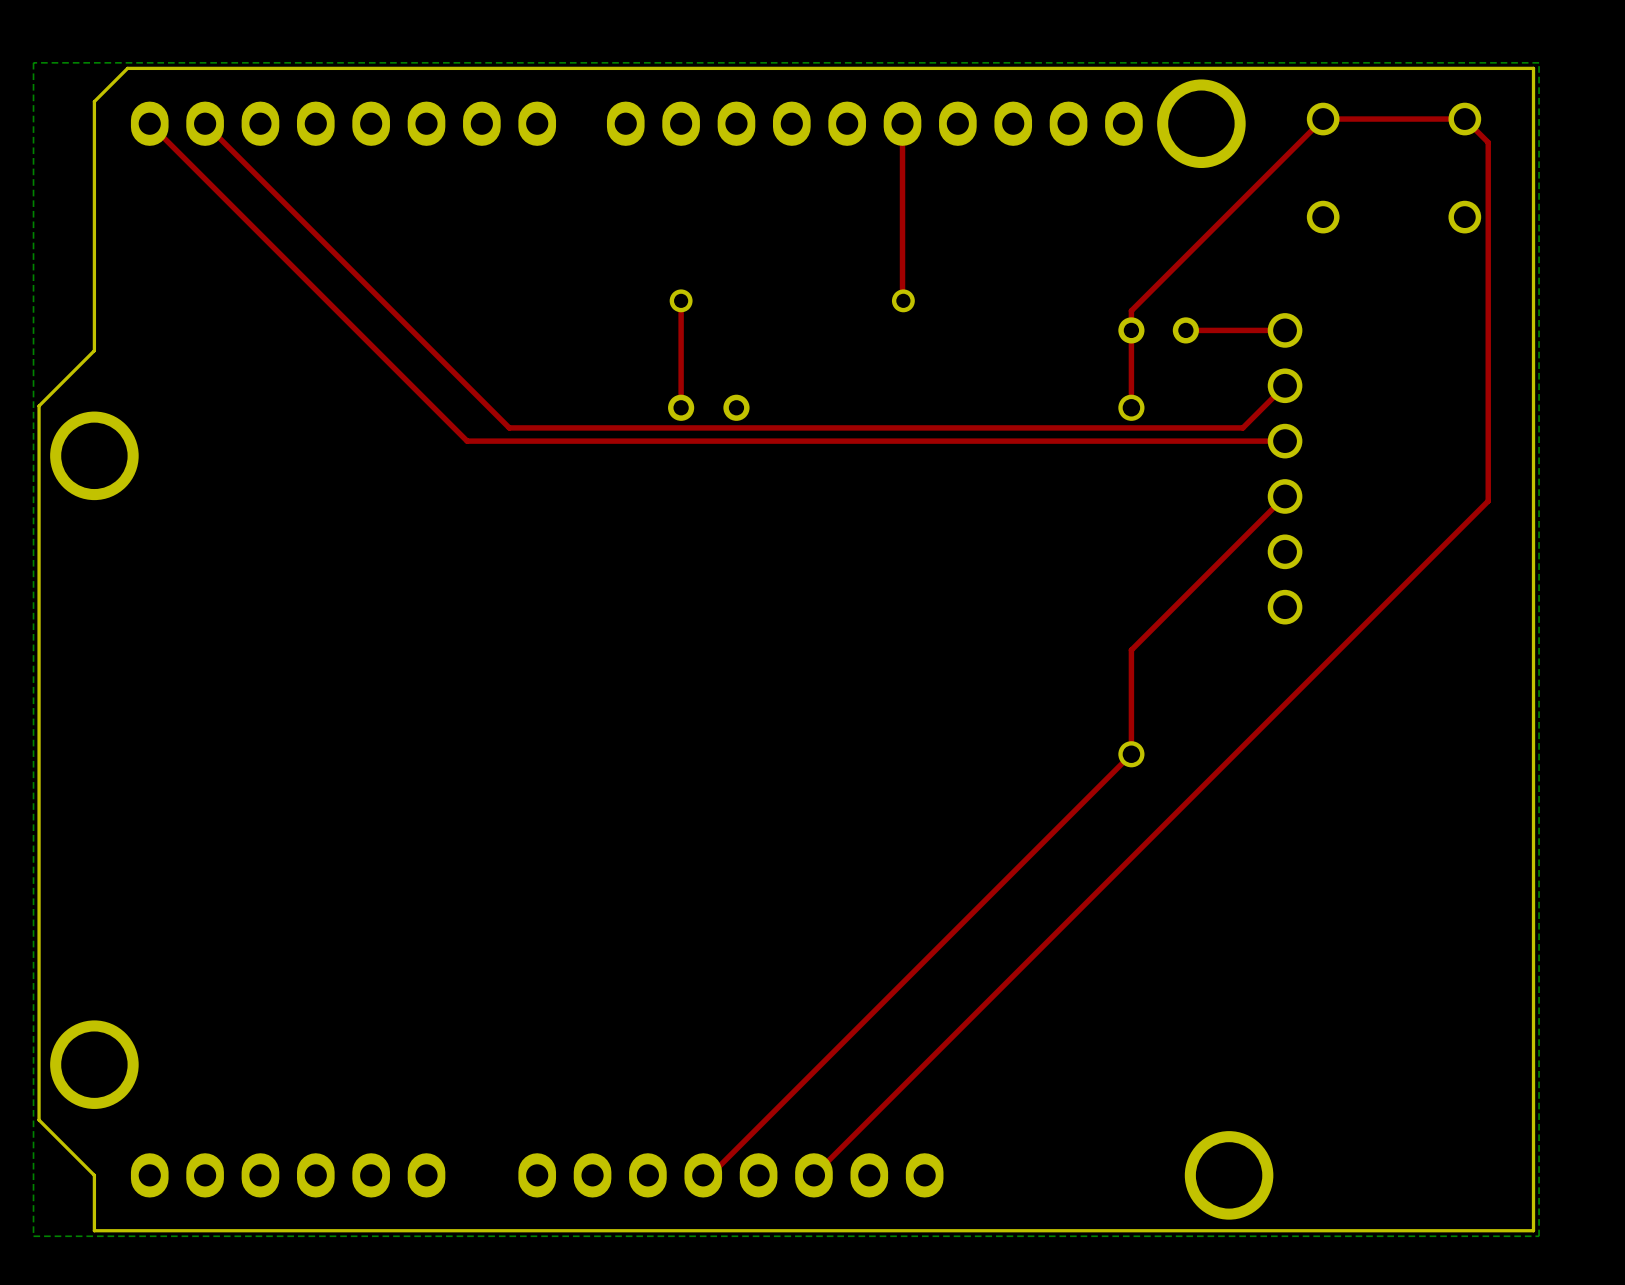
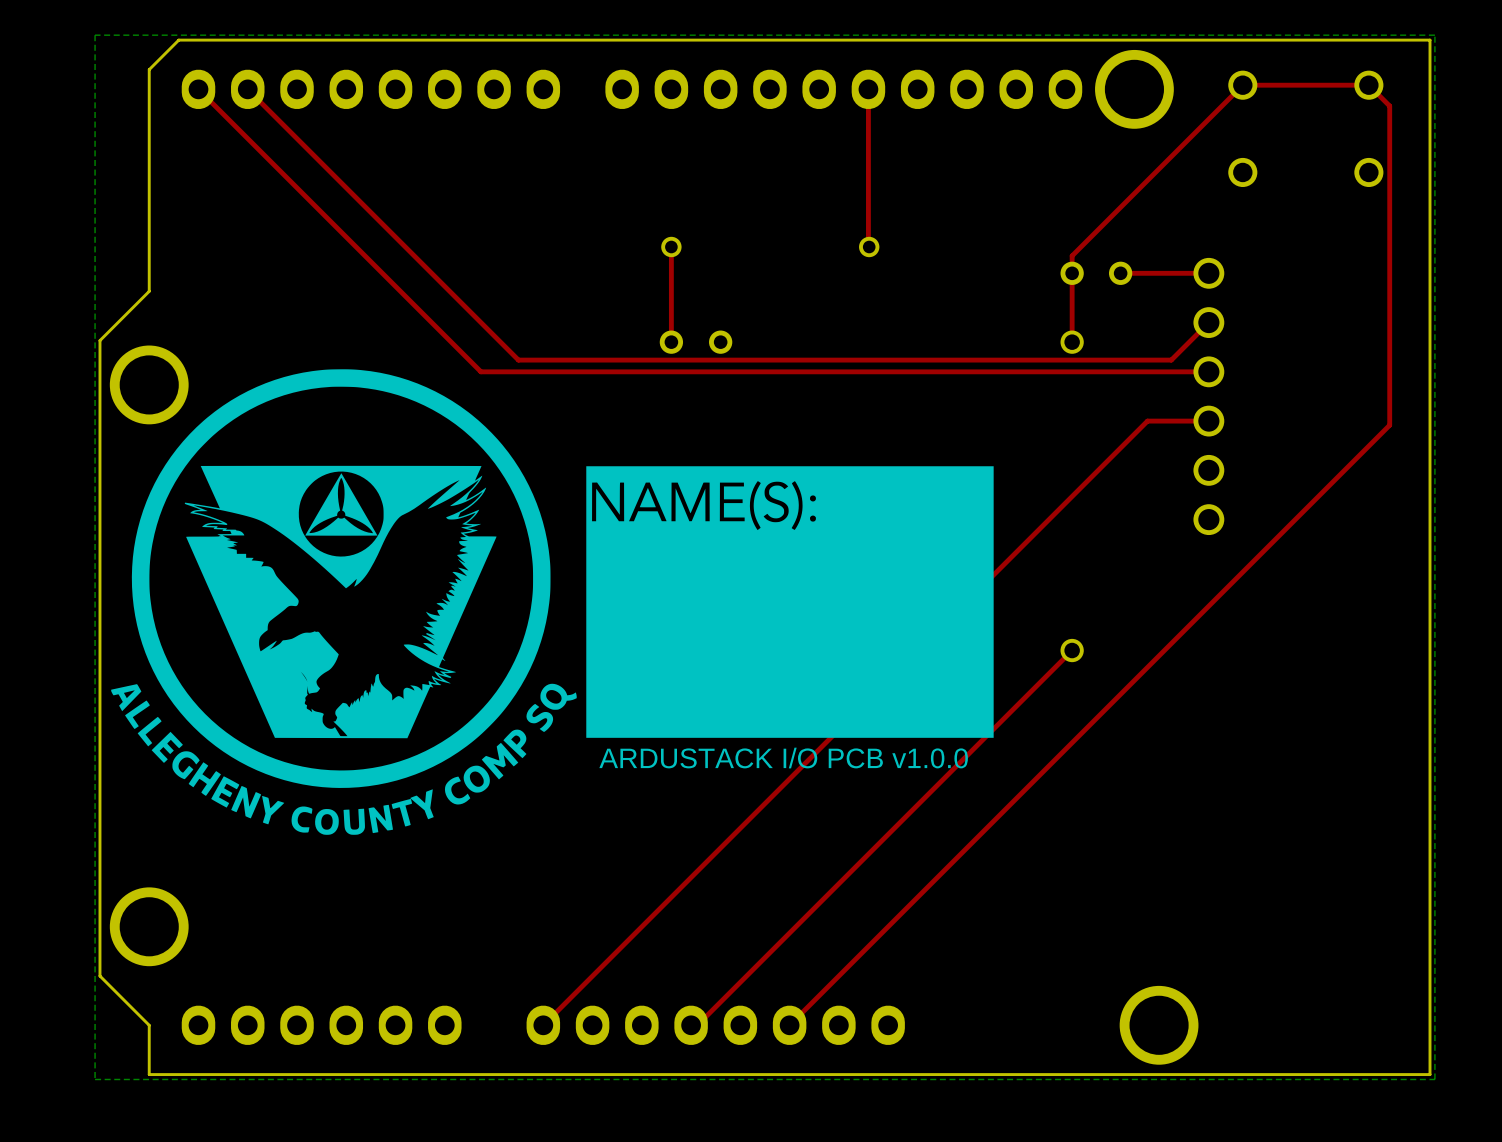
drawing: none -> [111, 369, 994, 835]
top track: (1285, 496) (1131, 650) (1131, 754) -> (1208, 421) (1147, 421) (543, 1025)
text: none -> ARDUSTACK I/O PCB v1.0.0 (783, 758)

